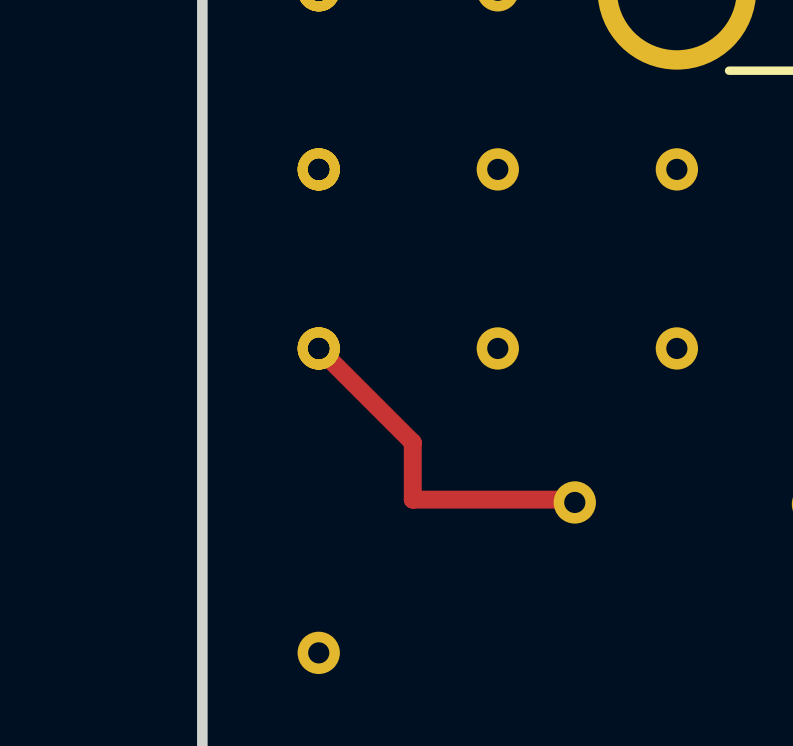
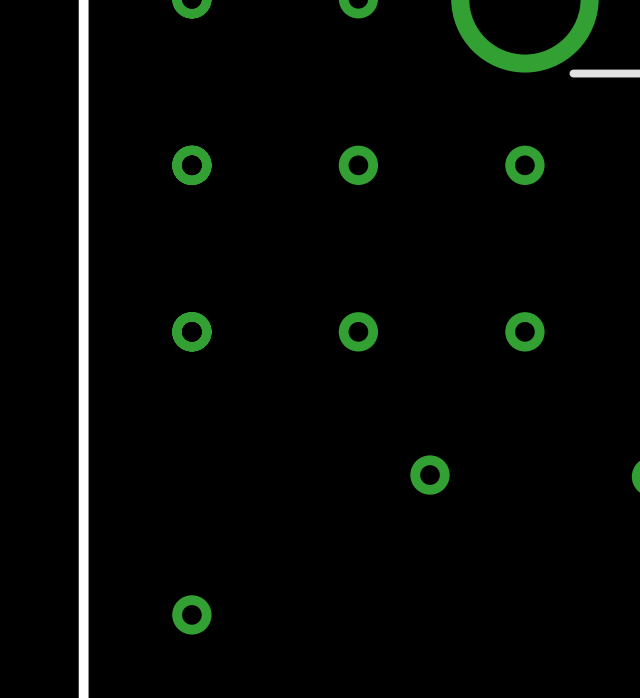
top track: (318, 348) (412, 442) (412, 499) (571, 499) (574, 502) -> none

